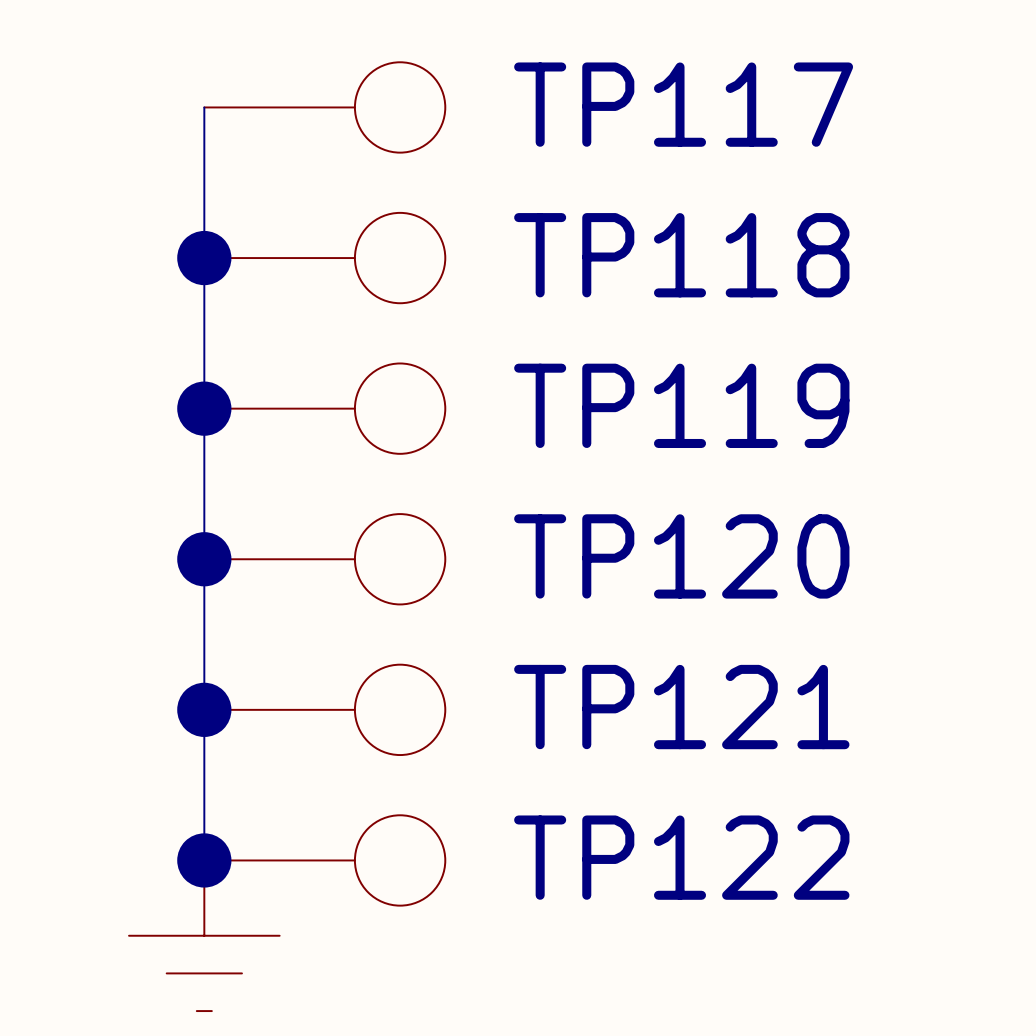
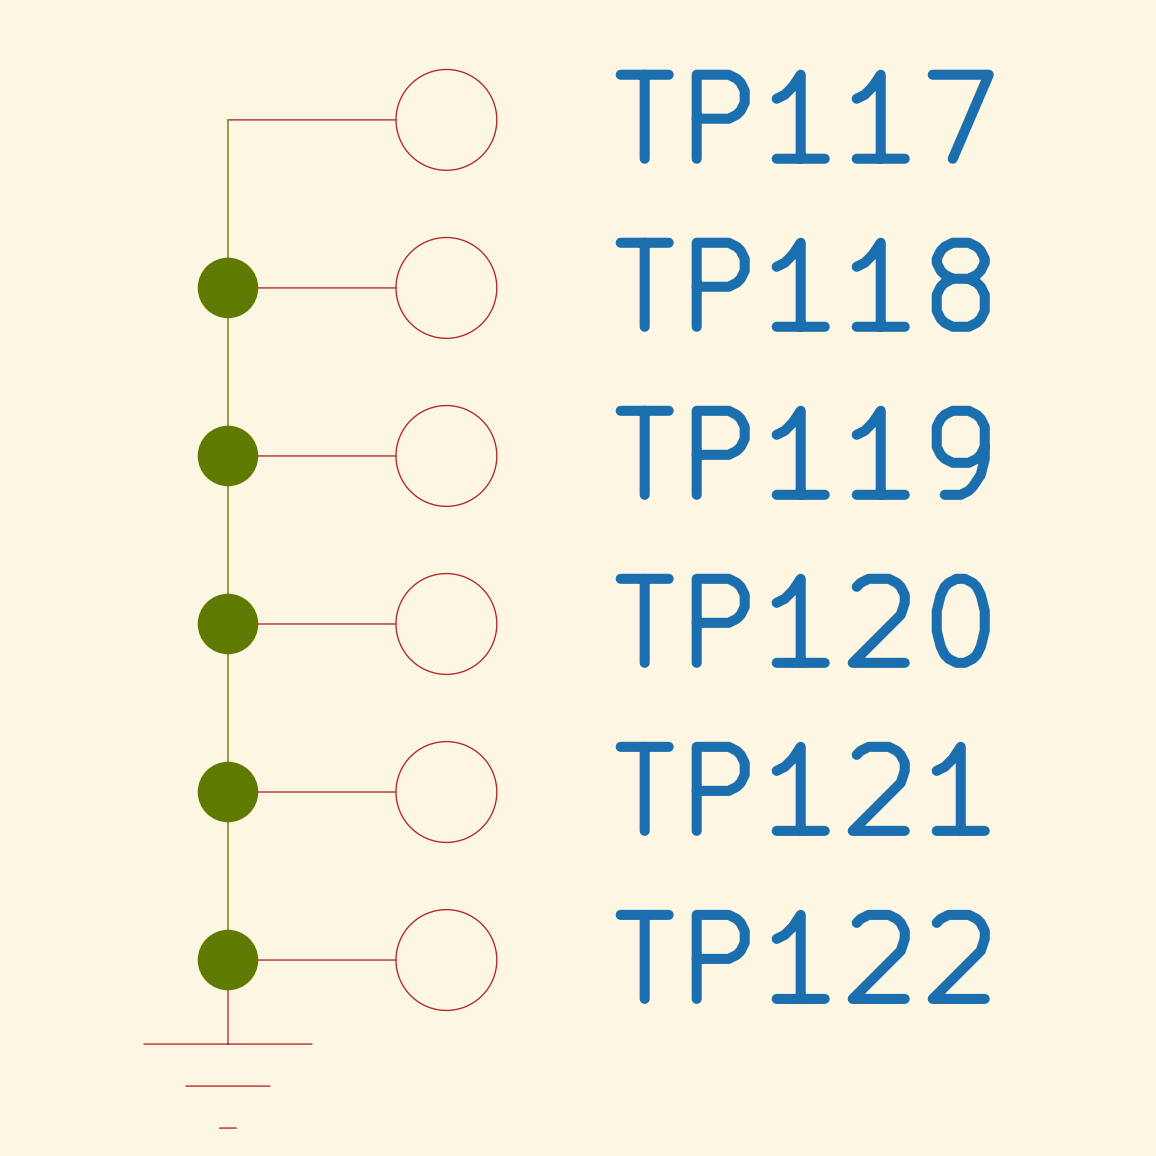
TP117 name position: TP117 (683, 104) -> TP117 (804, 116)
TP118 name position: TP118 (681, 255) -> TP118 (802, 284)
TP119 name position: TP119 (681, 405) -> TP119 (802, 452)
TP120 name position: TP120 (681, 556) -> TP120 (802, 620)
TP121 name position: TP121 (681, 707) -> TP121 (802, 788)
TP122 name position: TP122 (681, 857) -> TP122 (802, 956)

